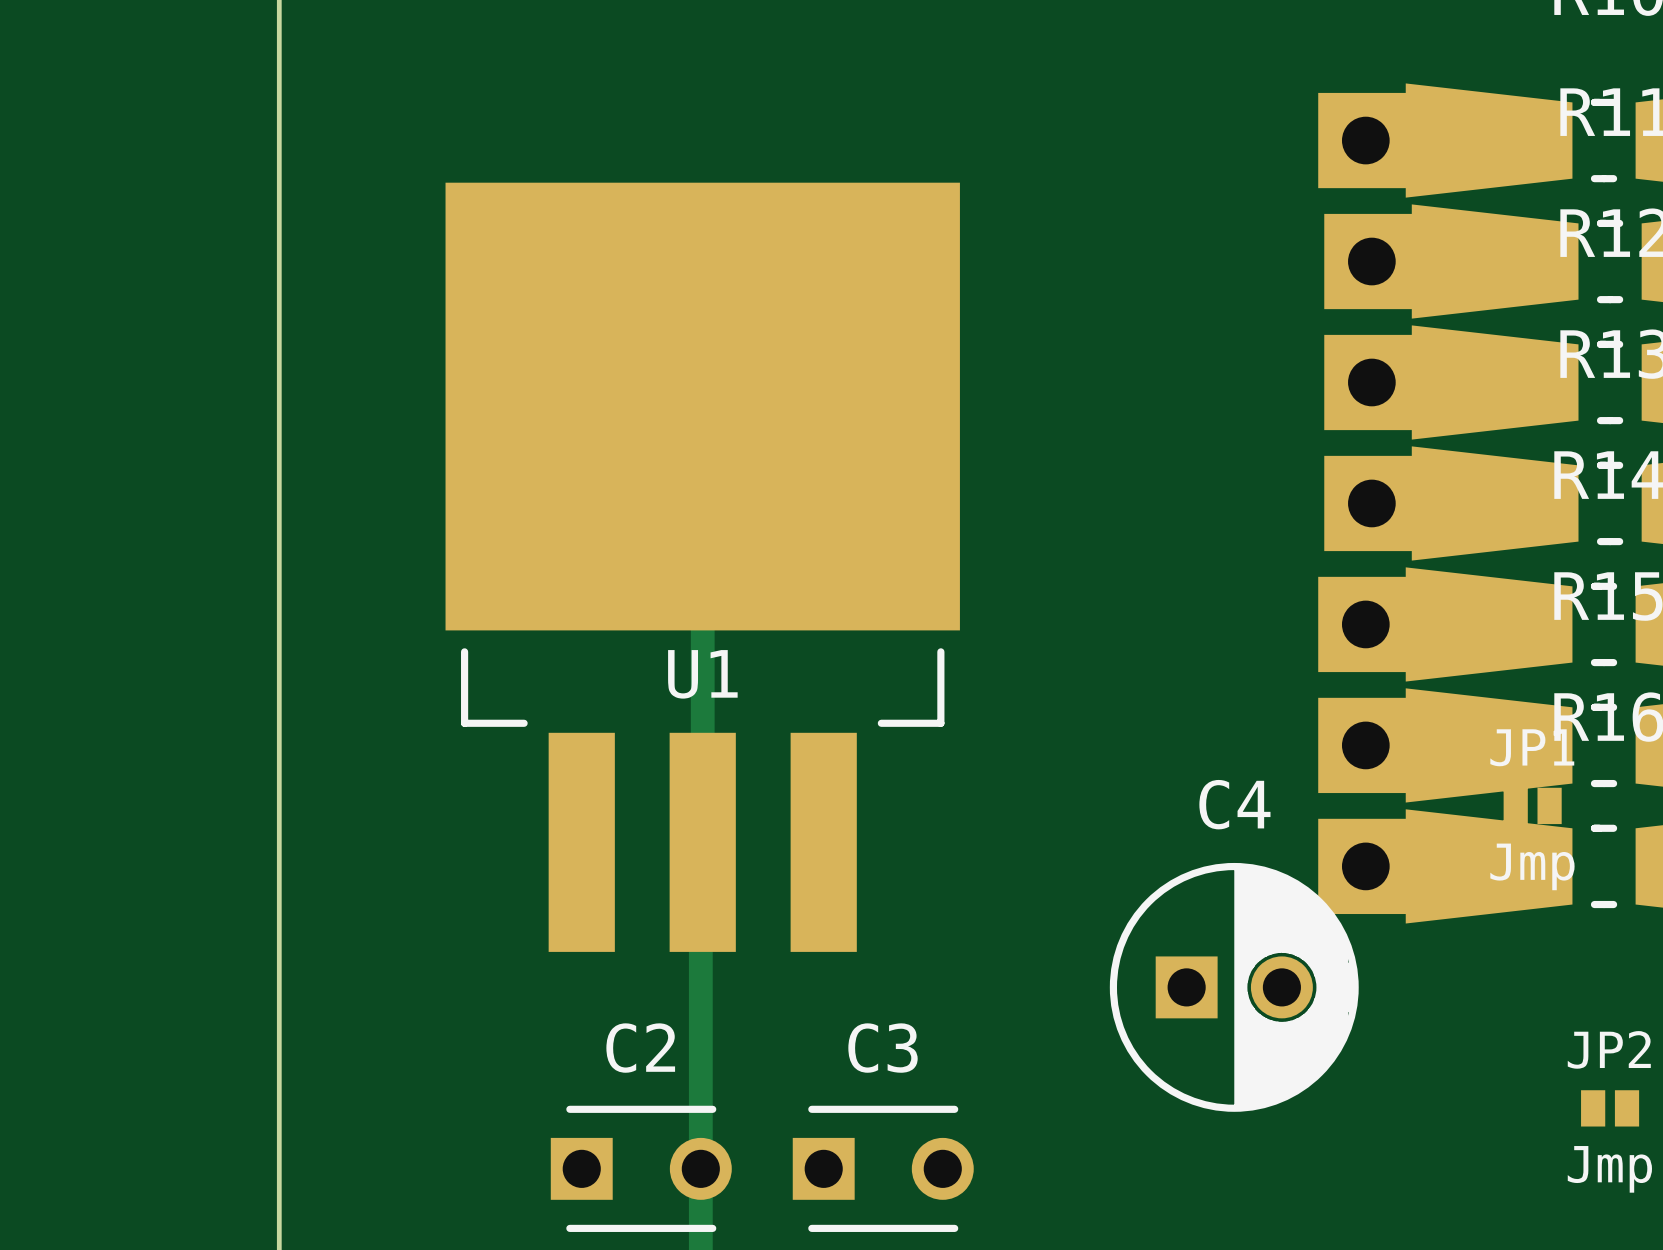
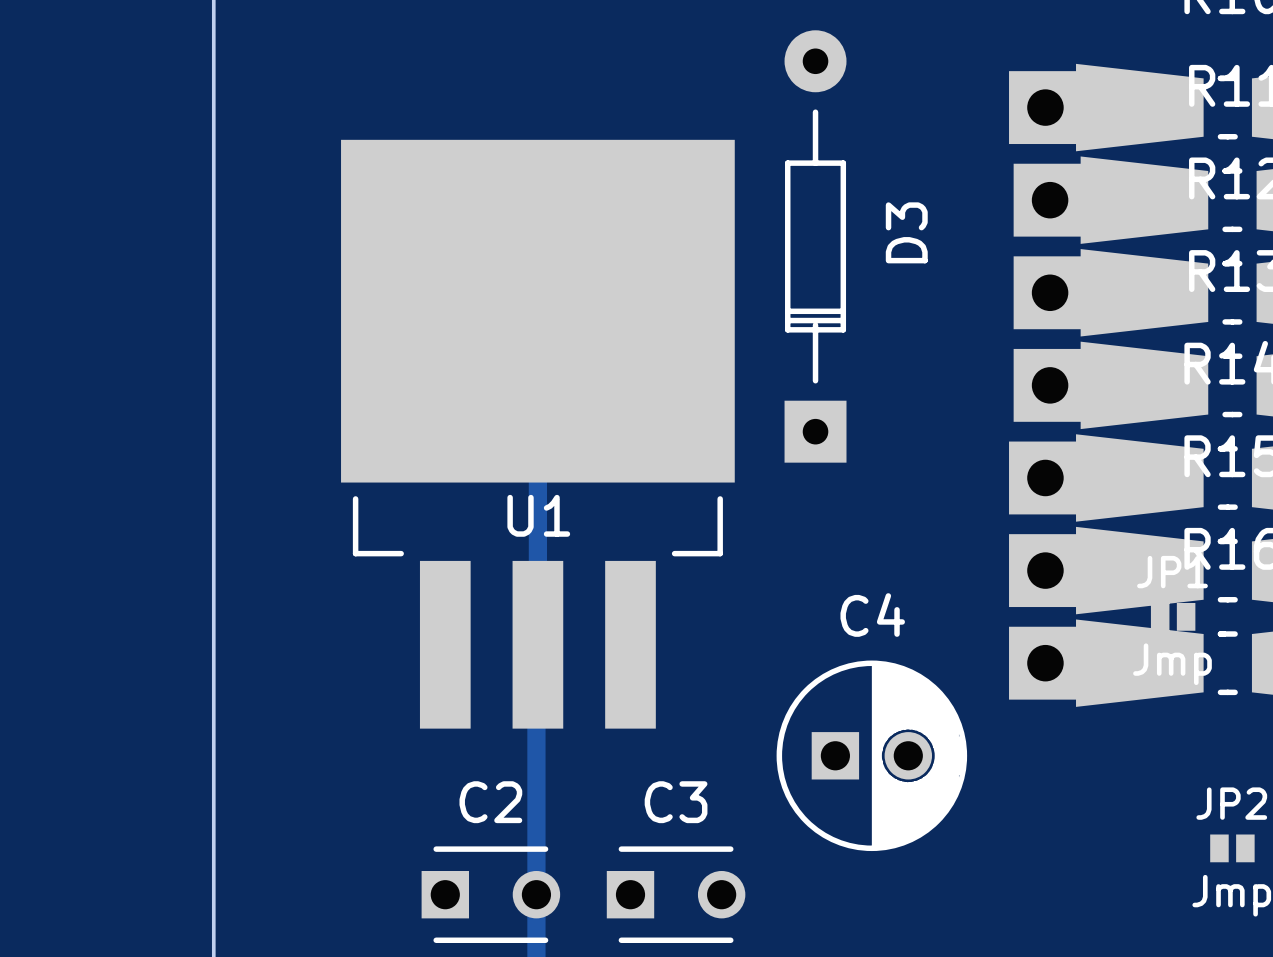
D3: none -> (815, 246)
C4 position: (1234, 987) -> (871, 755)

